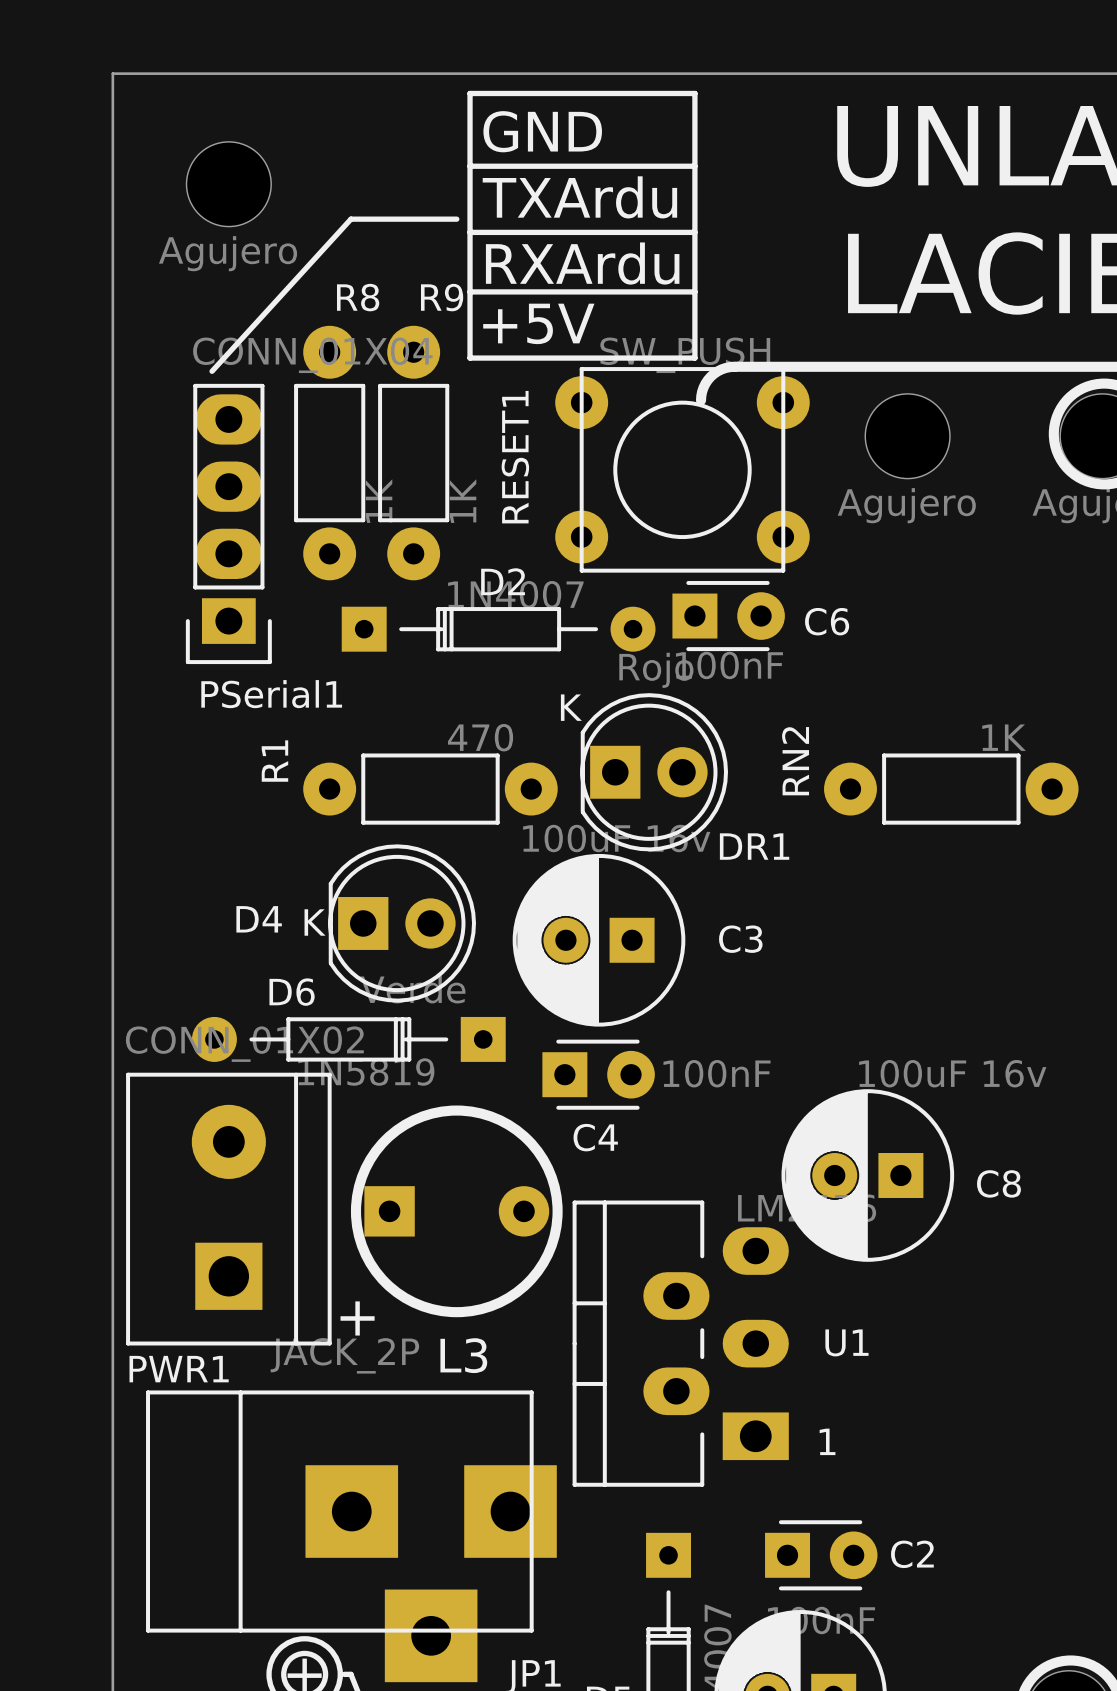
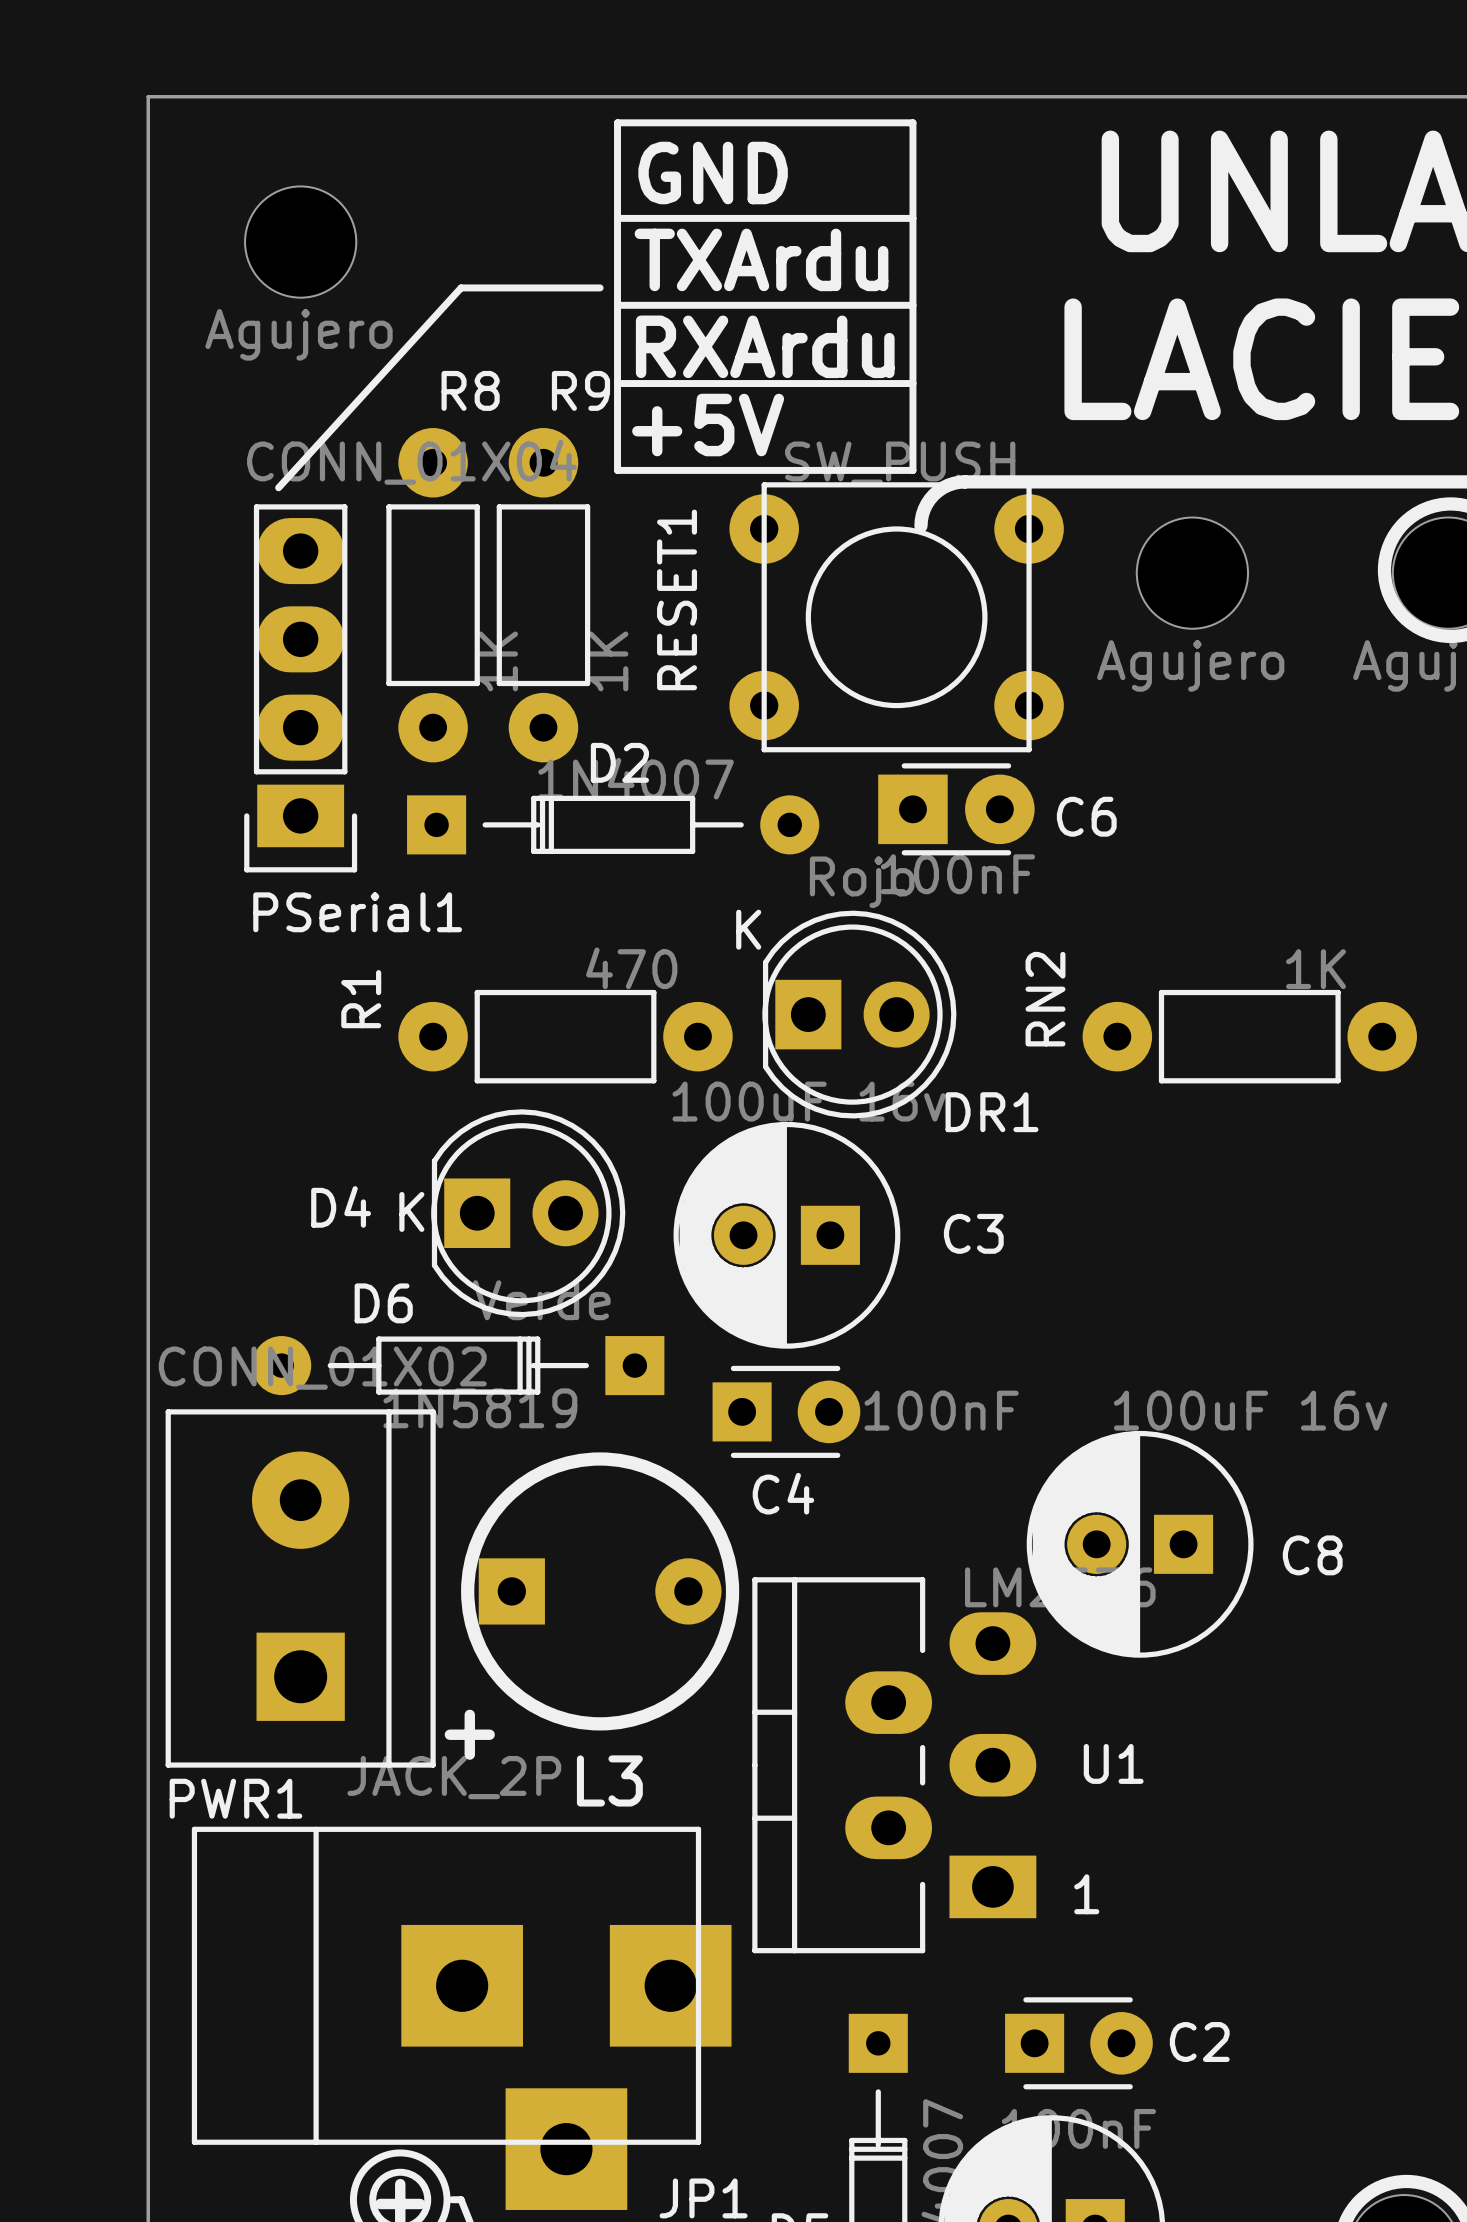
PSerial1 footprint: [185, 383, 272, 665] -> [244, 504, 358, 873]
C6 footprint: [672, 580, 785, 652] -> [878, 763, 1035, 856]
D2 position: (498, 629) -> (613, 824)

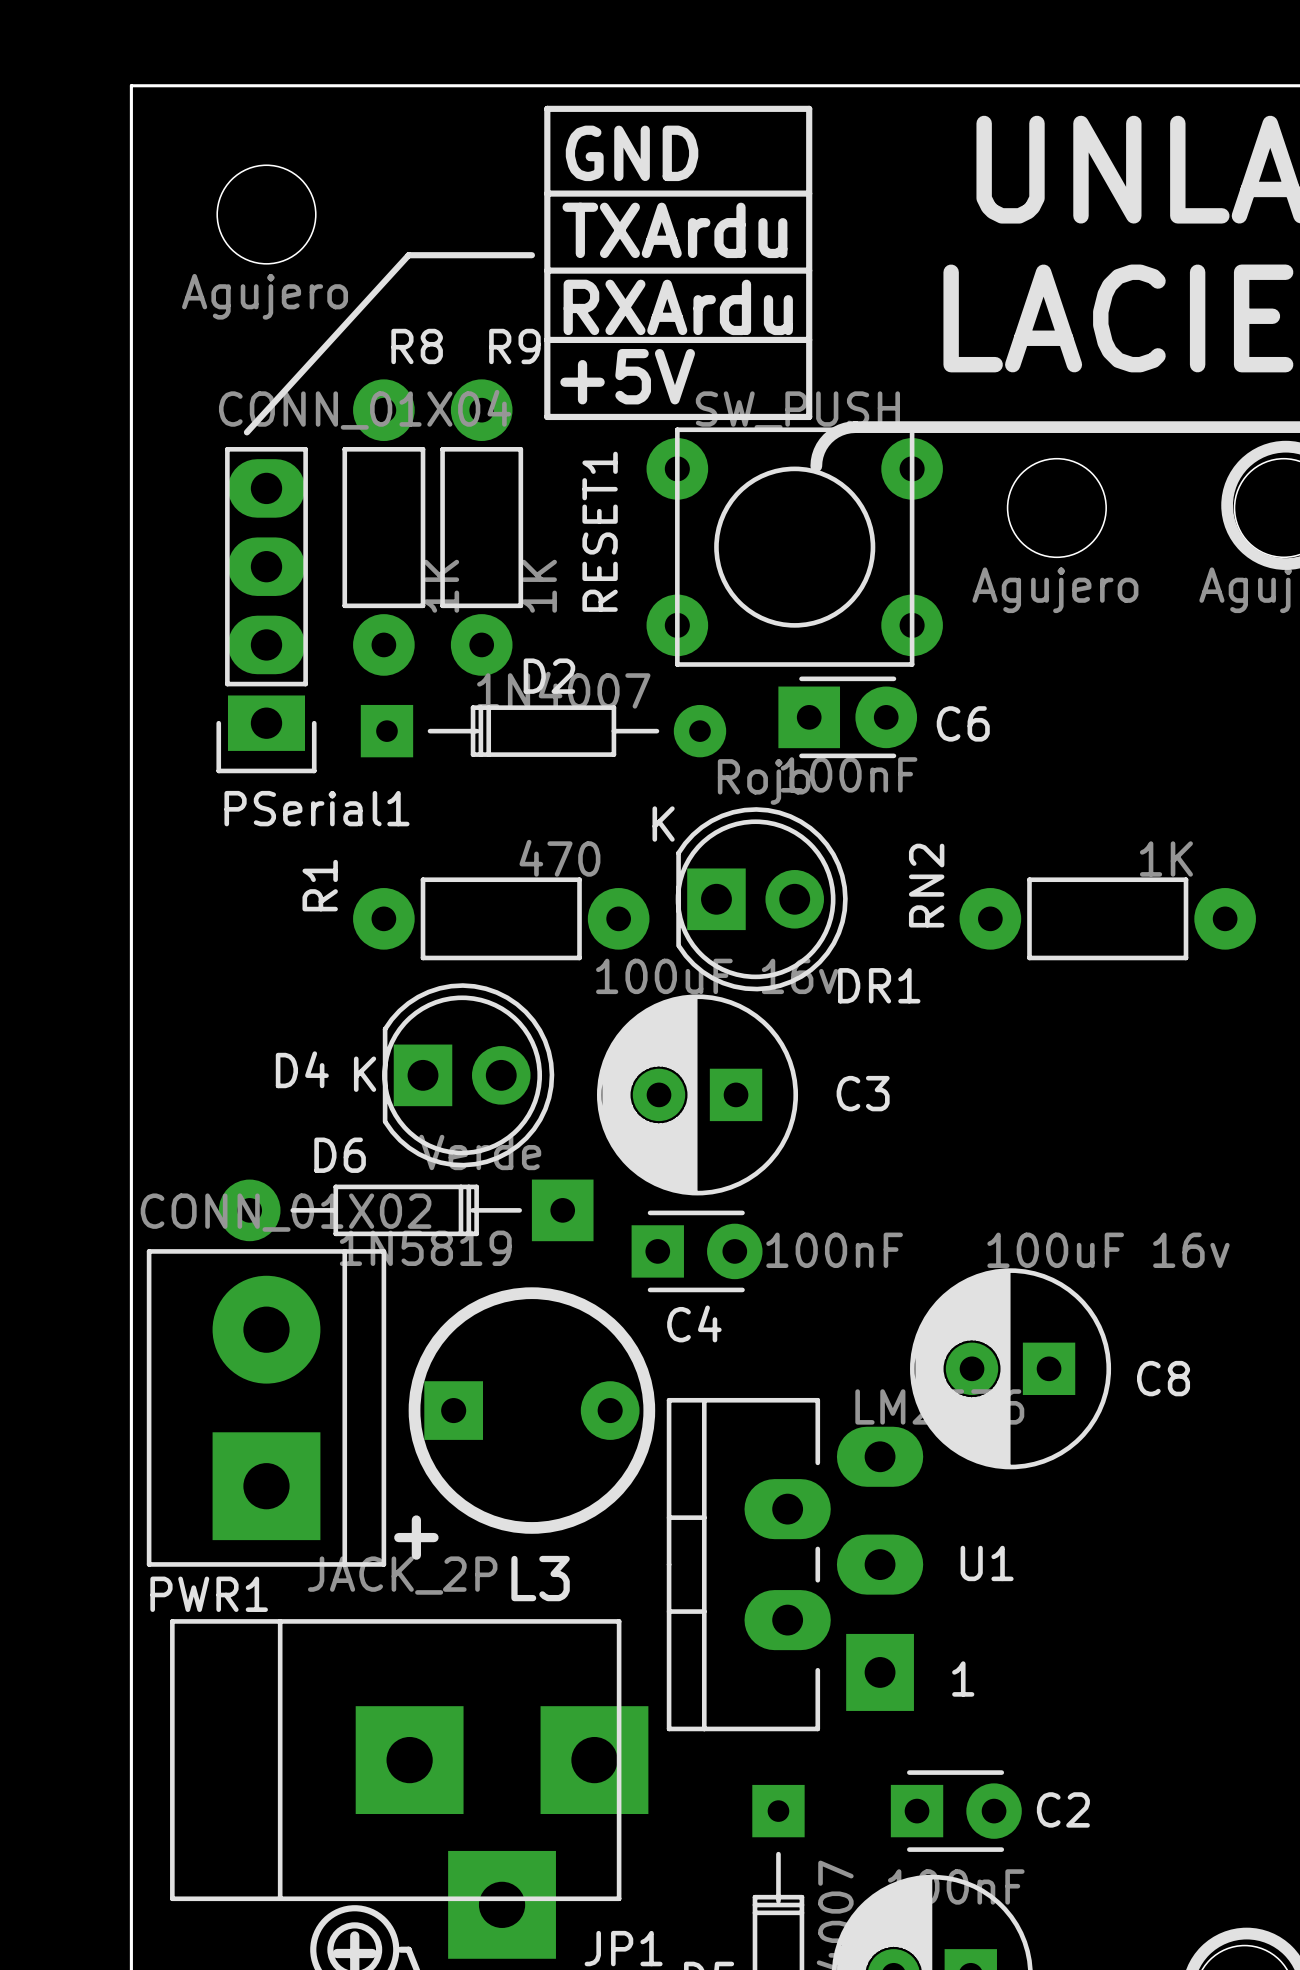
D6 footprint: [252, 1336, 665, 1396] -> [218, 1179, 594, 1242]
PWR1 footprint: [165, 1409, 436, 1768] -> [146, 1249, 387, 1567]
U1 footprint: [752, 1577, 1037, 1954] -> [666, 1397, 924, 1732]

